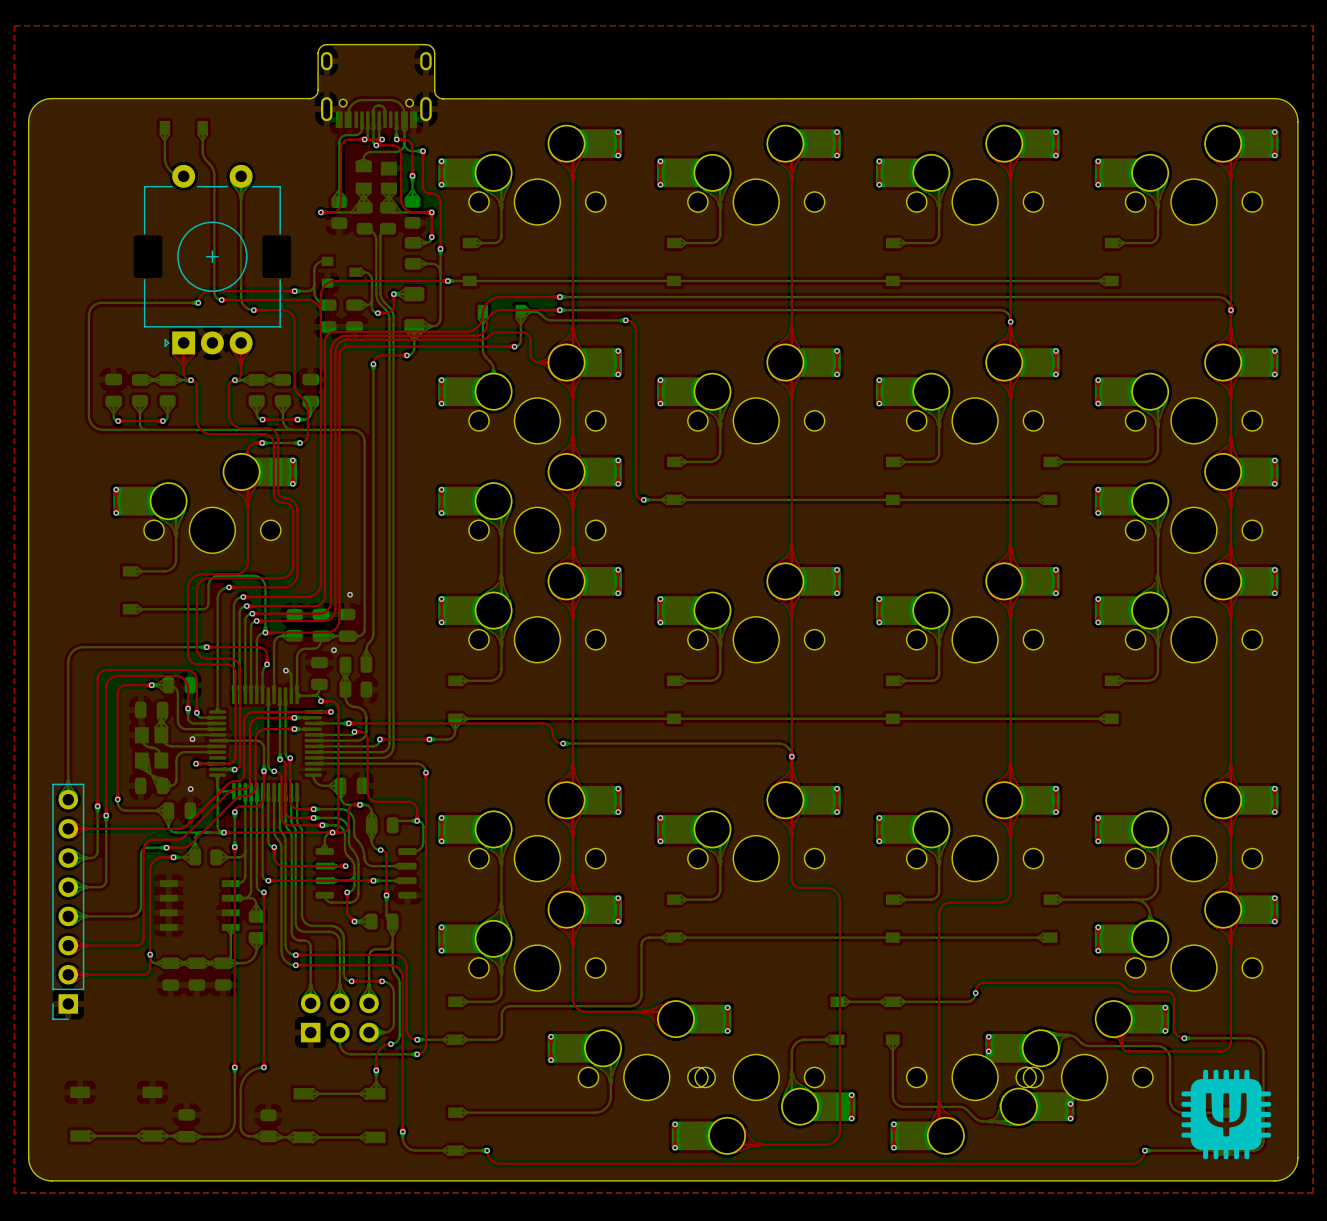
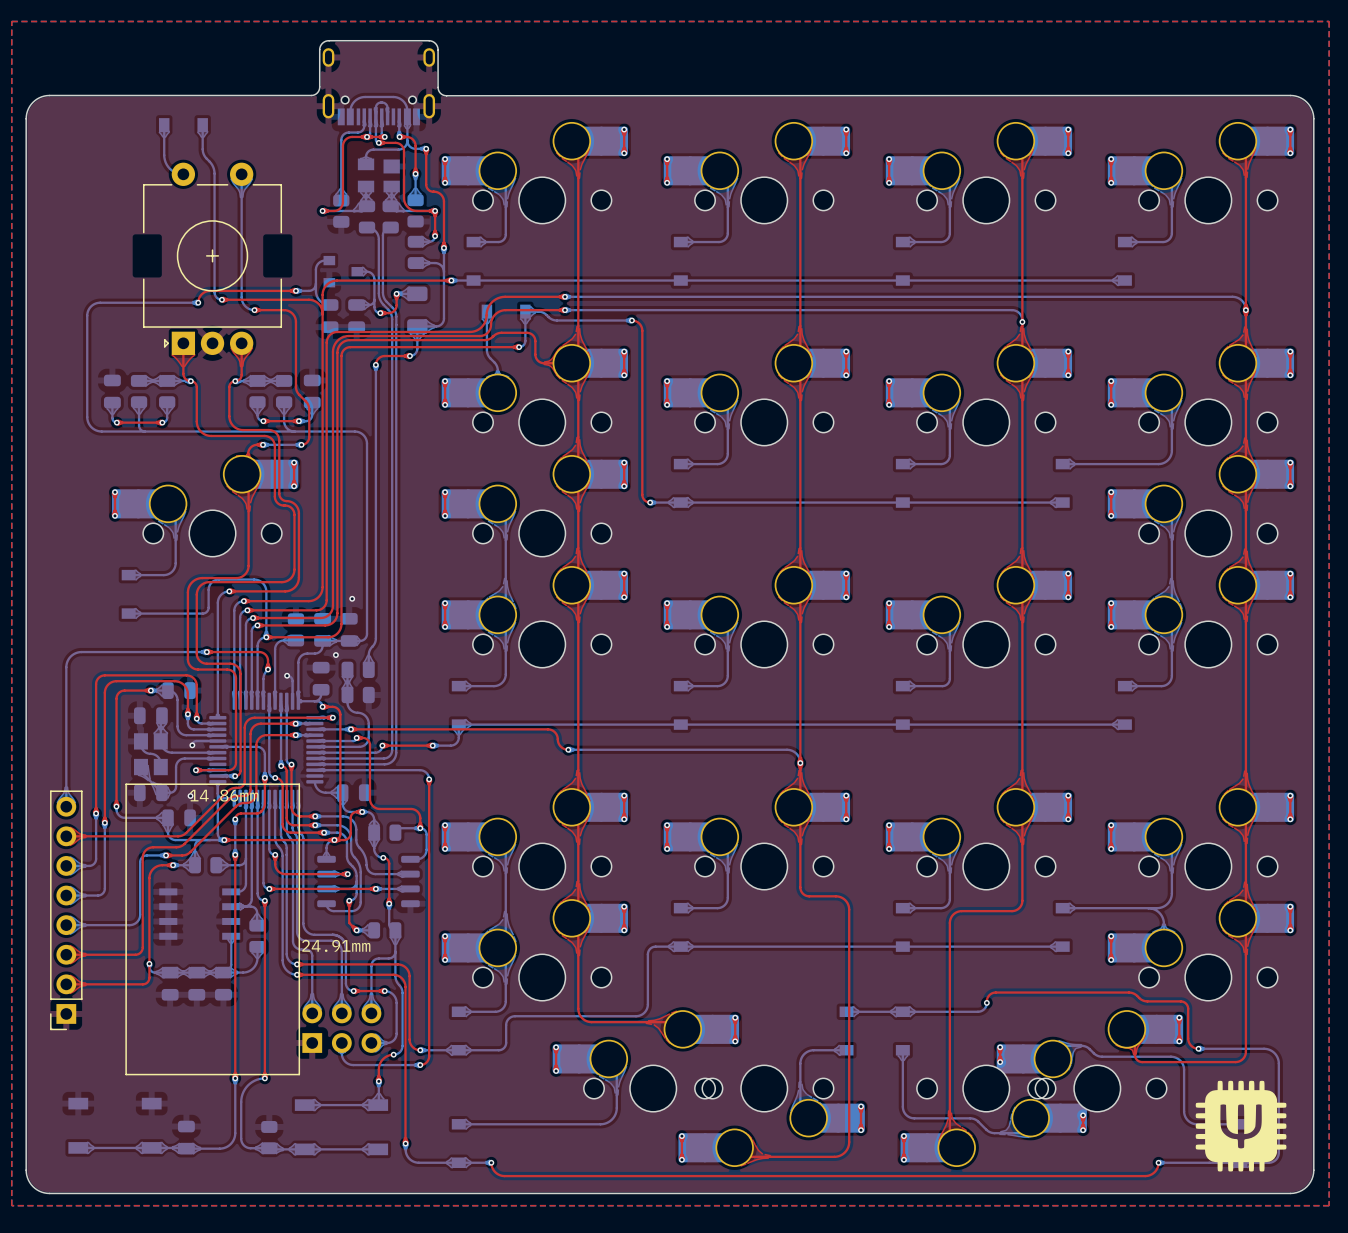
line: none -> (126, 784) (126, 1074) (299, 1074) (299, 784) (126, 784)
text: none -> 14.86mm (224, 795)
text: none -> 24.91mm (336, 945)

